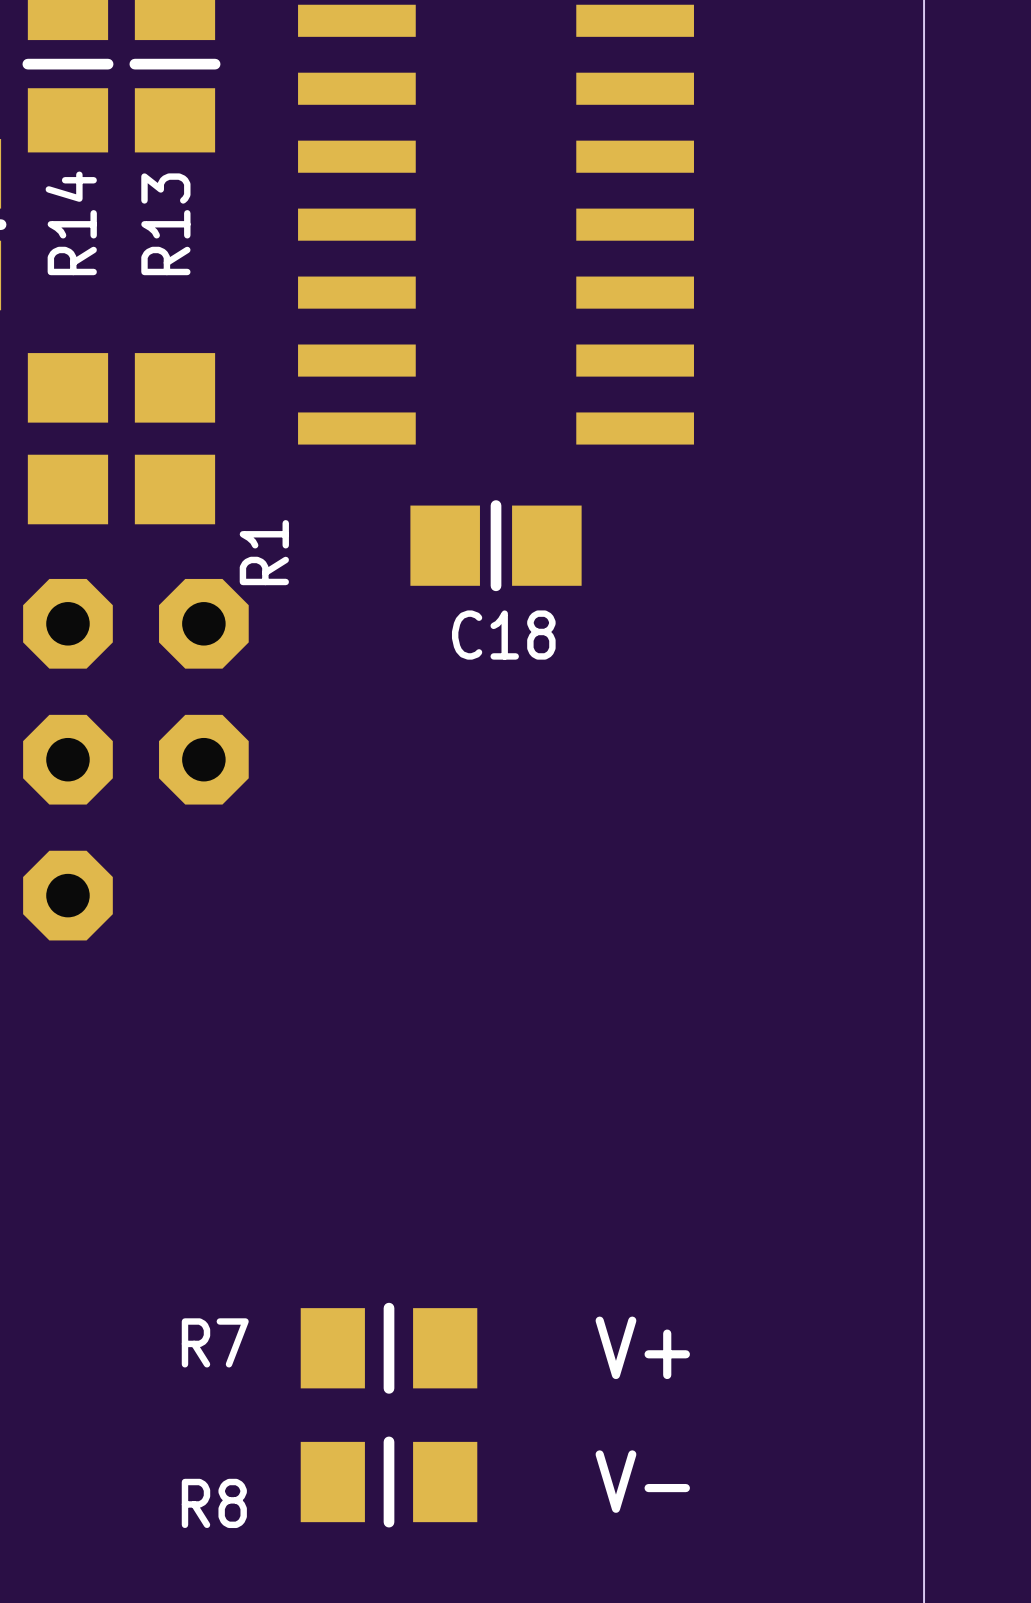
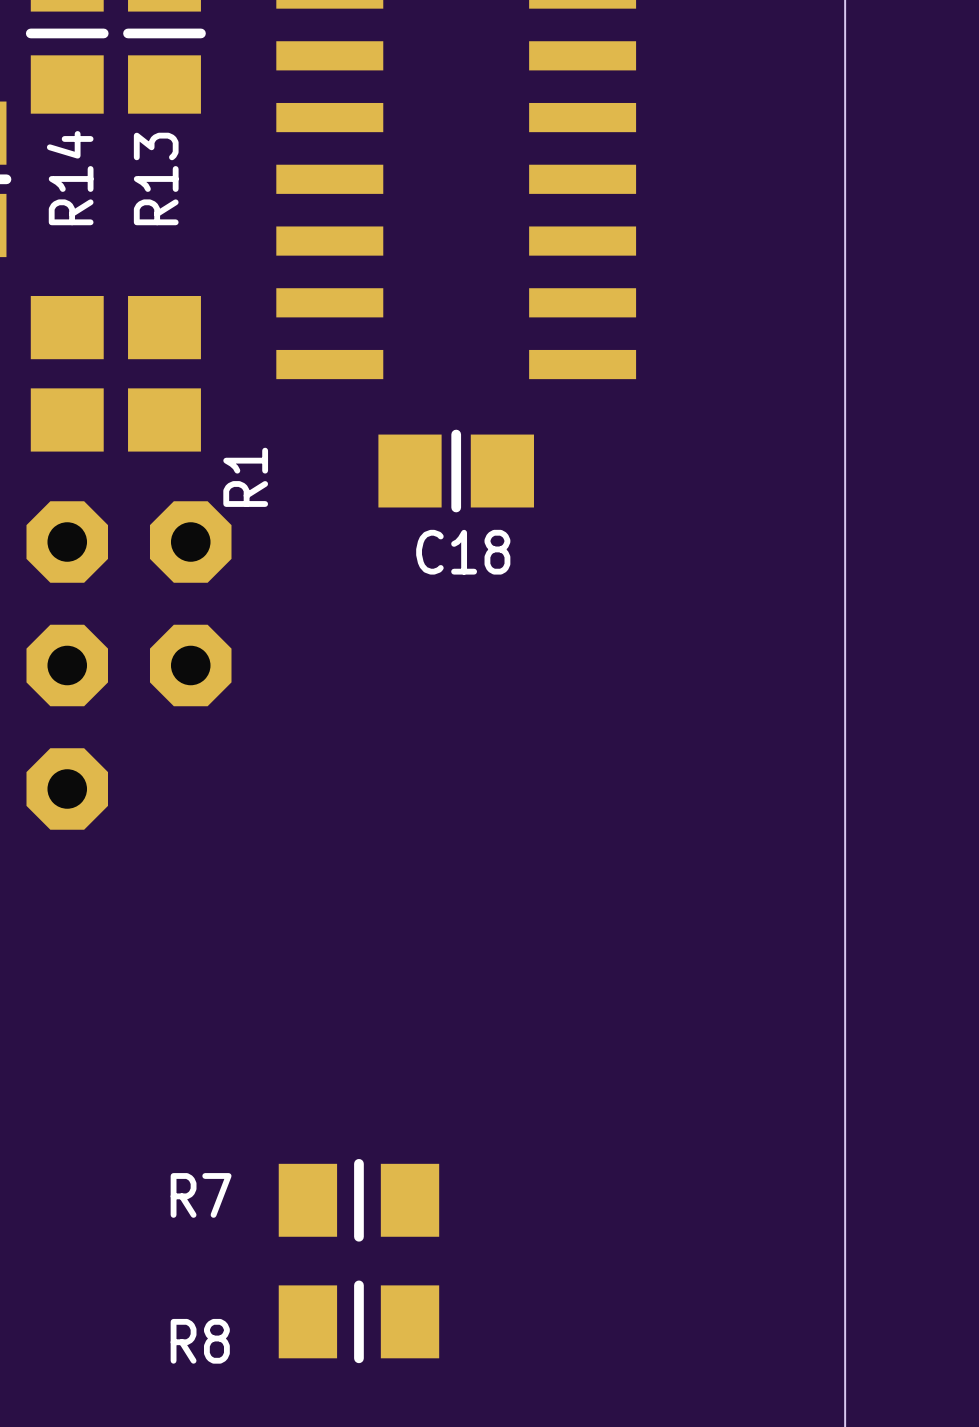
text: V+ (642, 1347) -> none
text: V- (642, 1481) -> none

